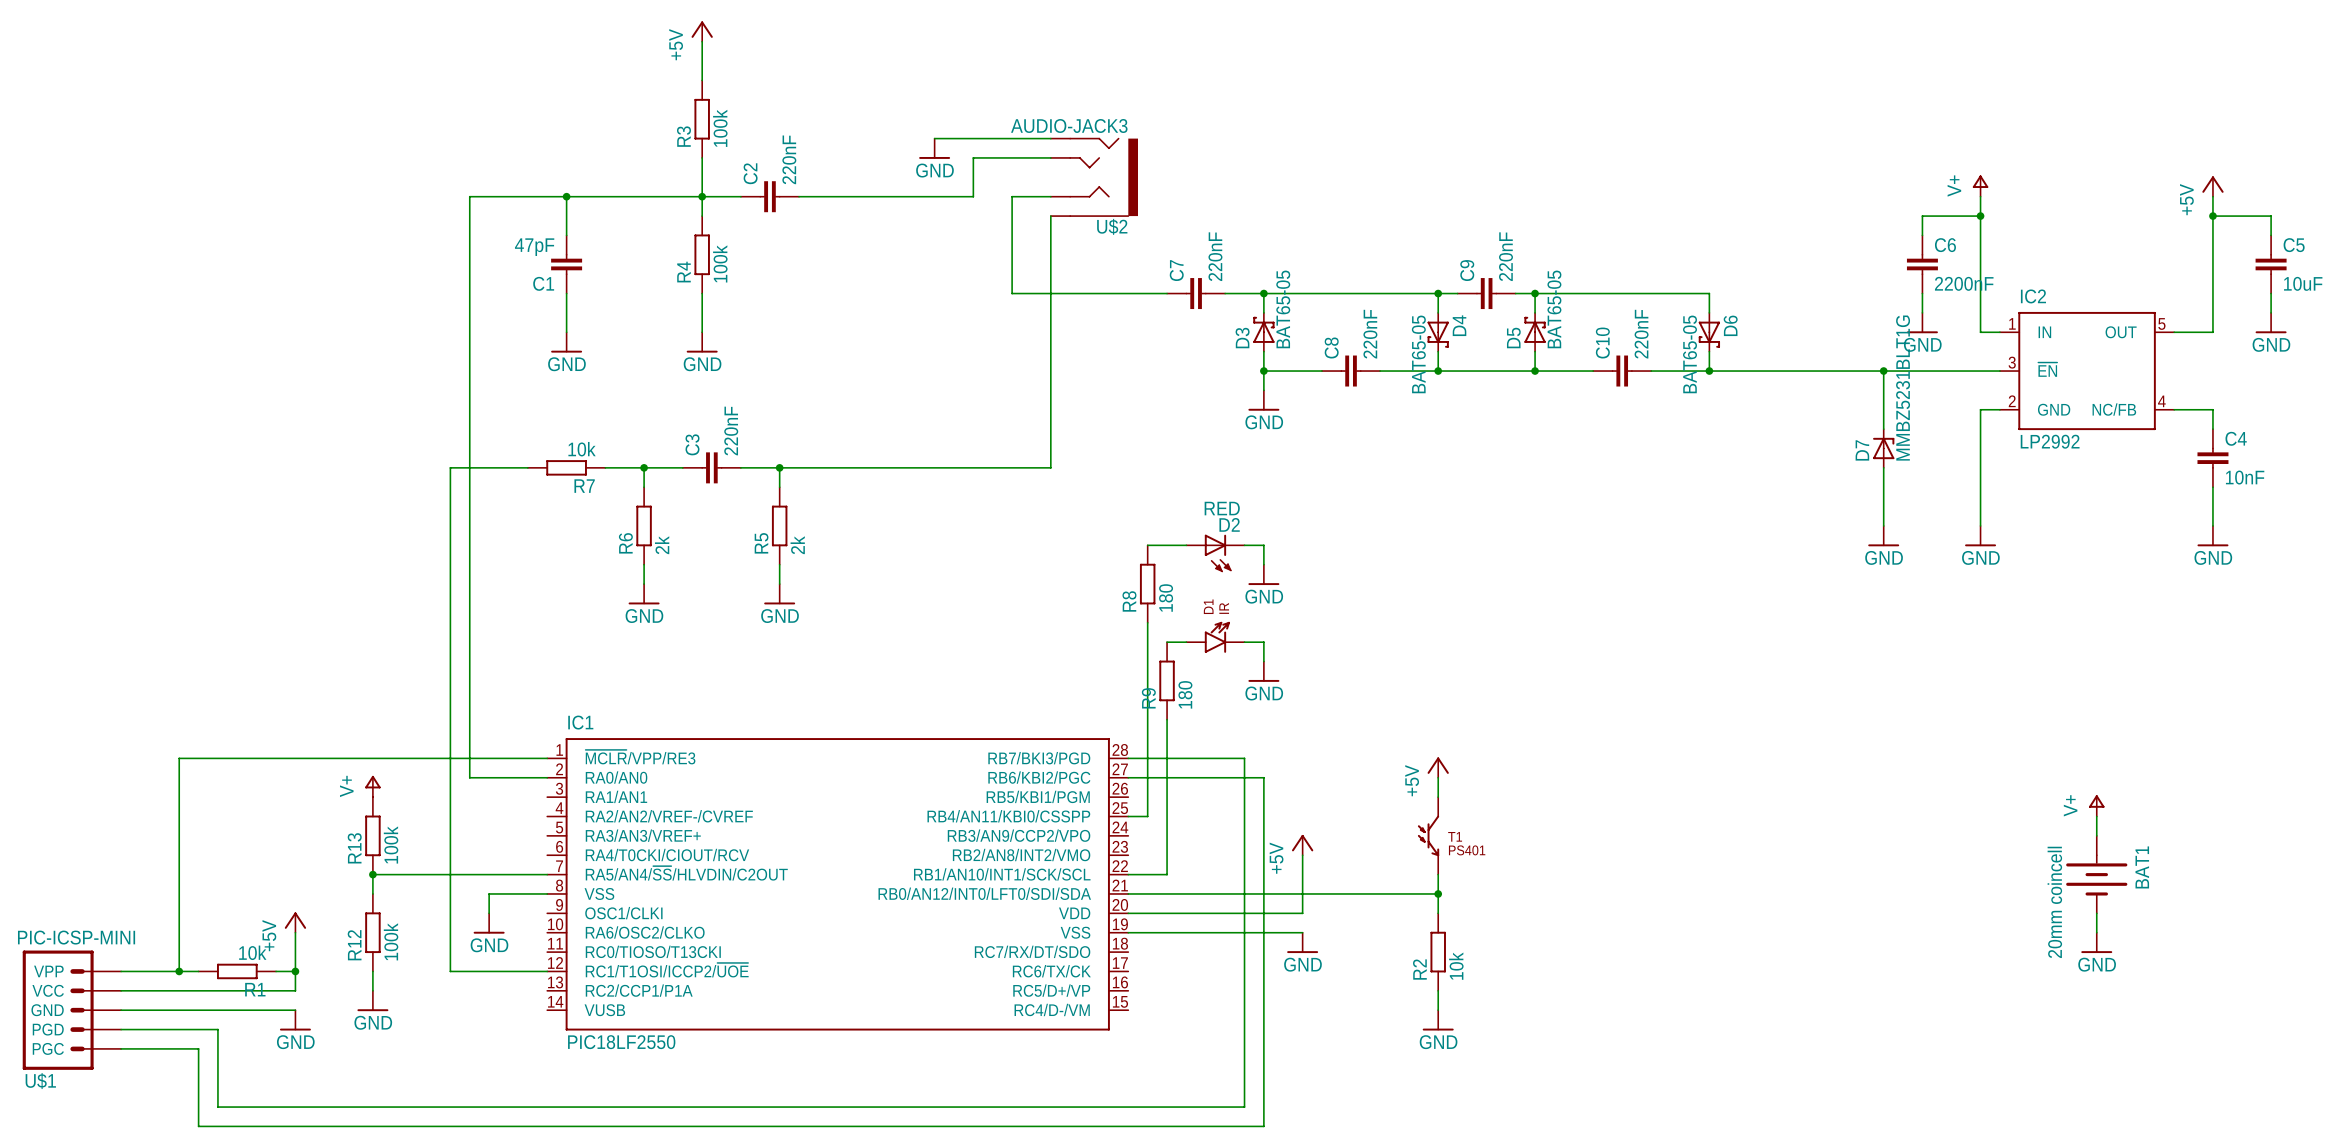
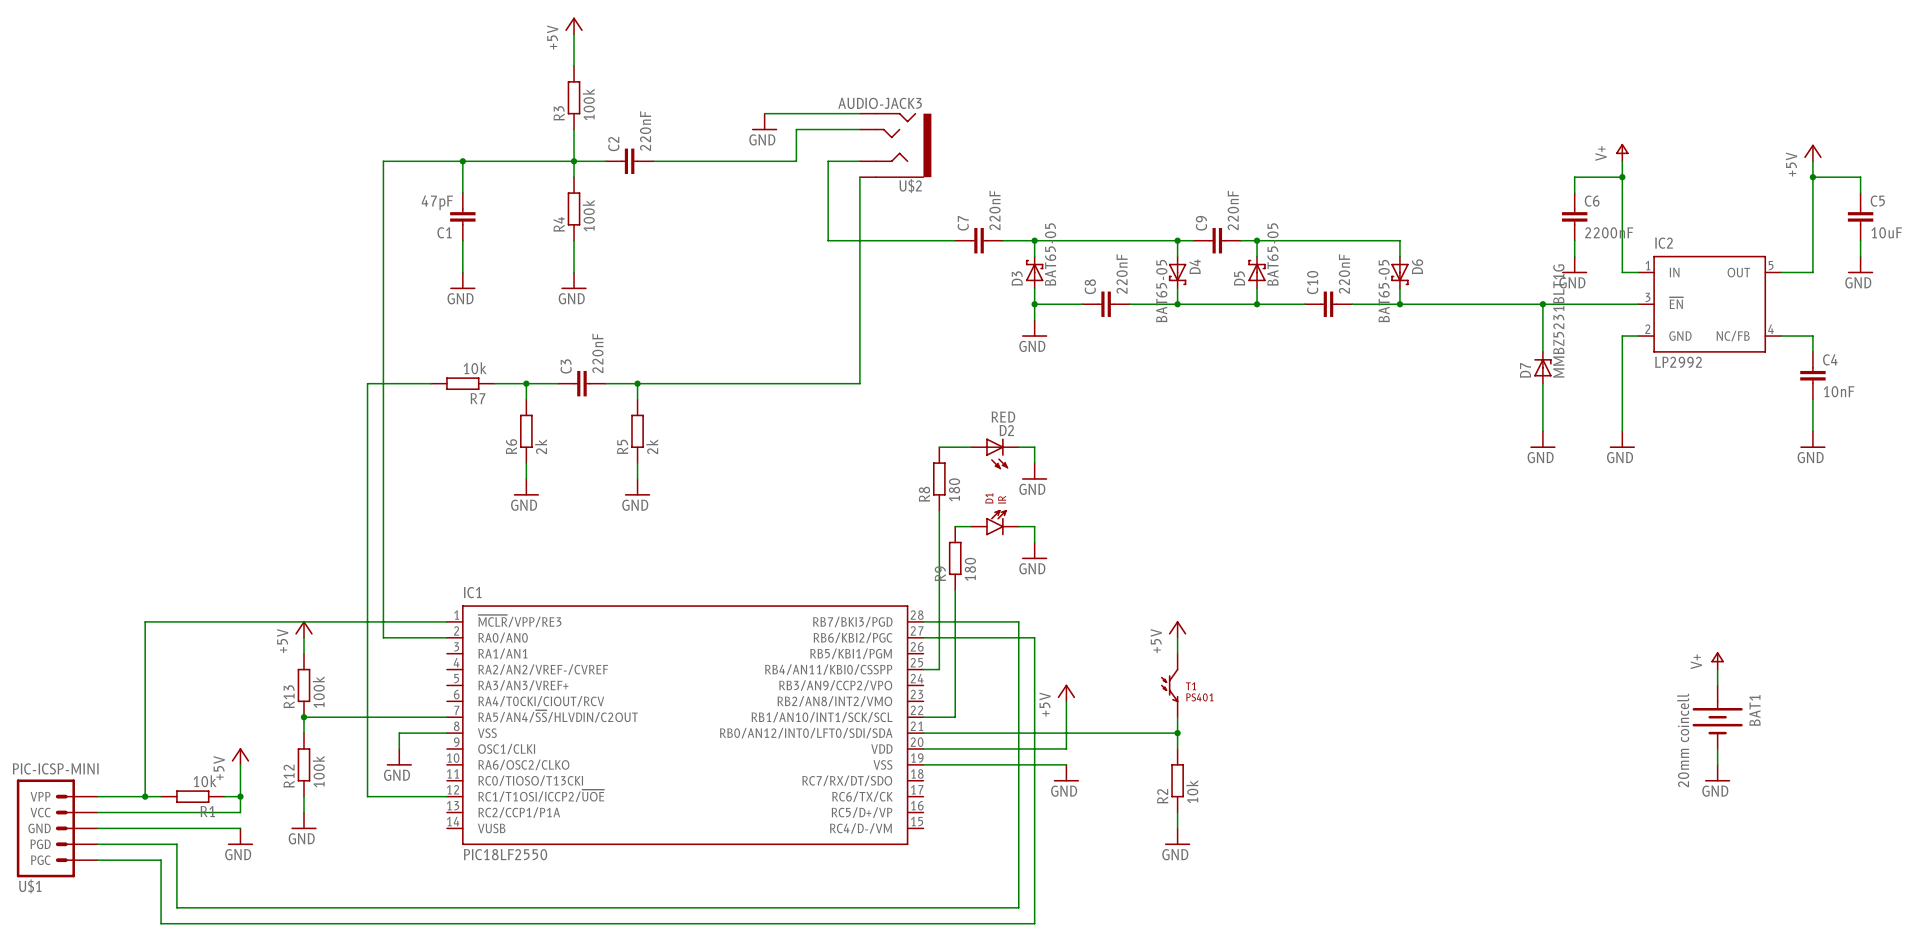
power symbol: none -> +5V (304, 629)
power symbol: V+ (372, 786) -> none

